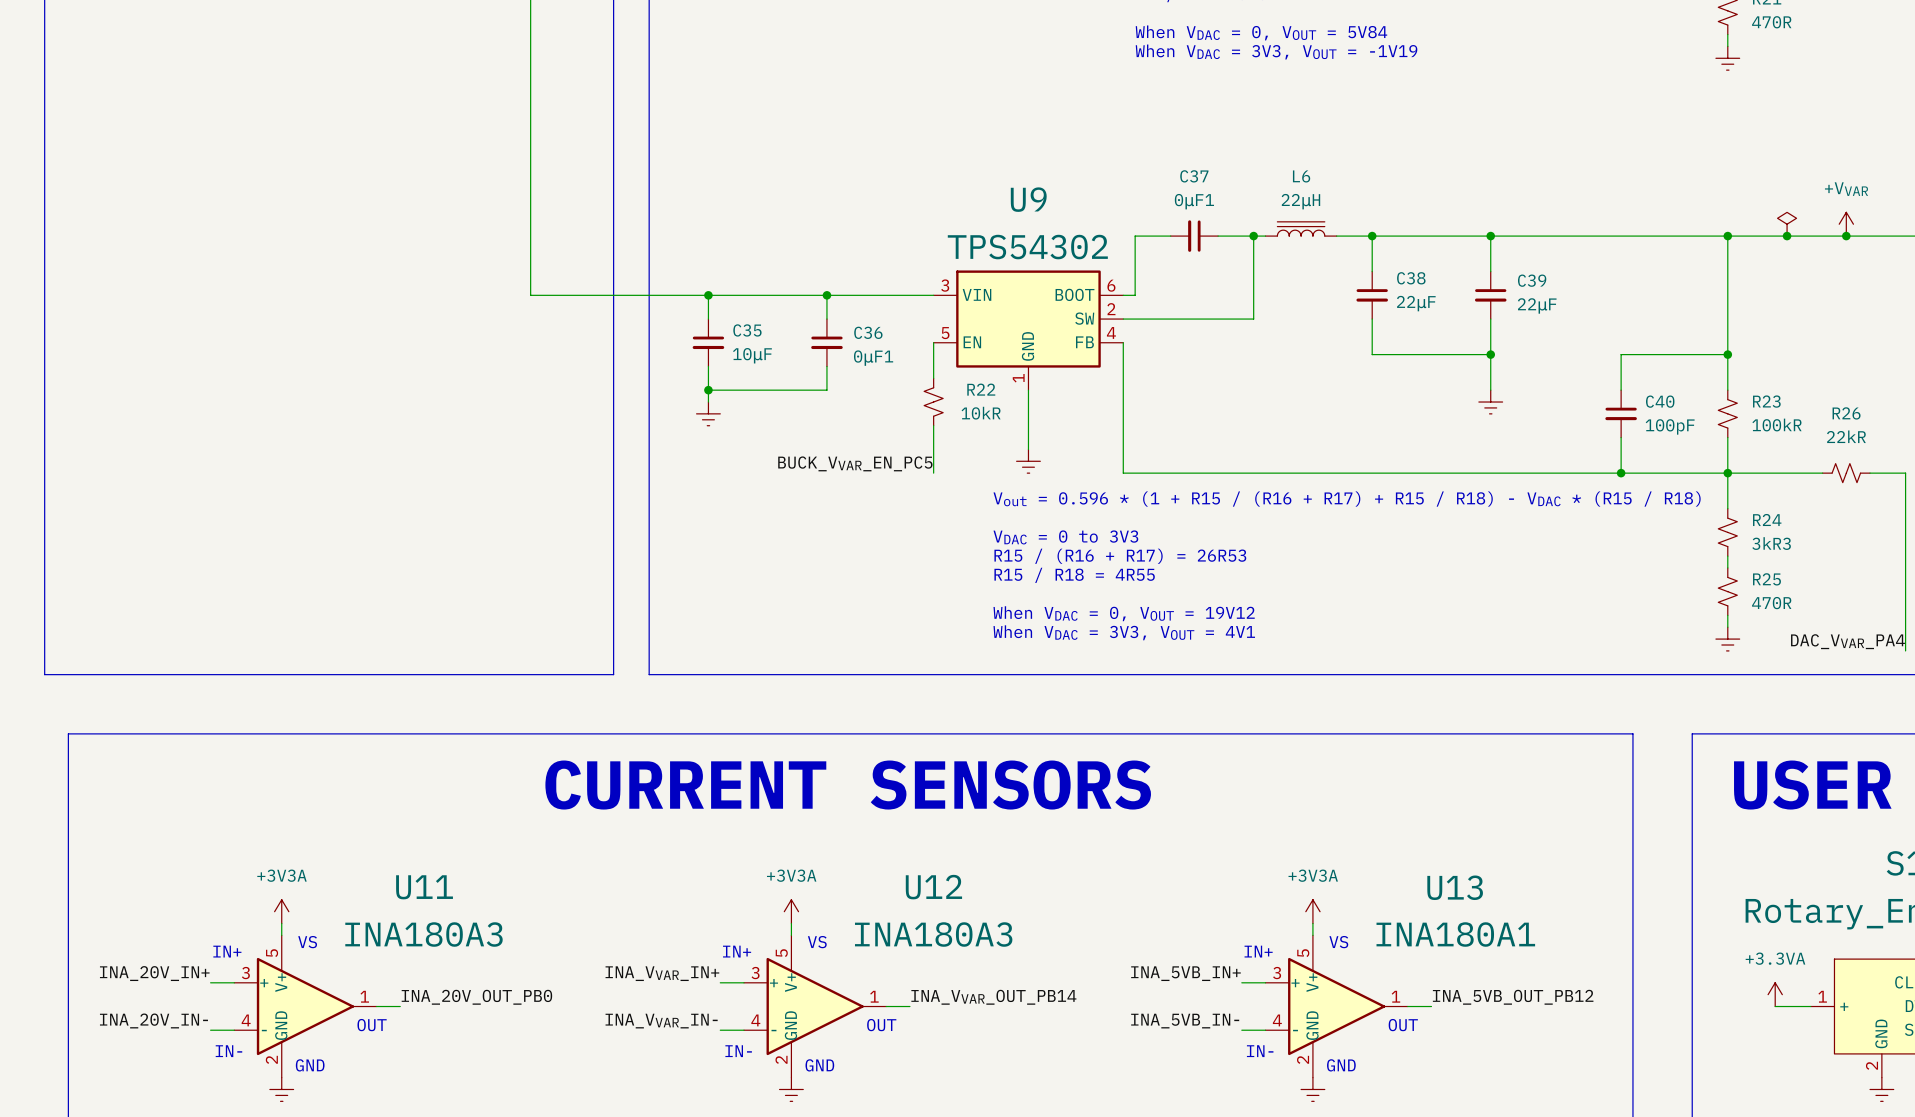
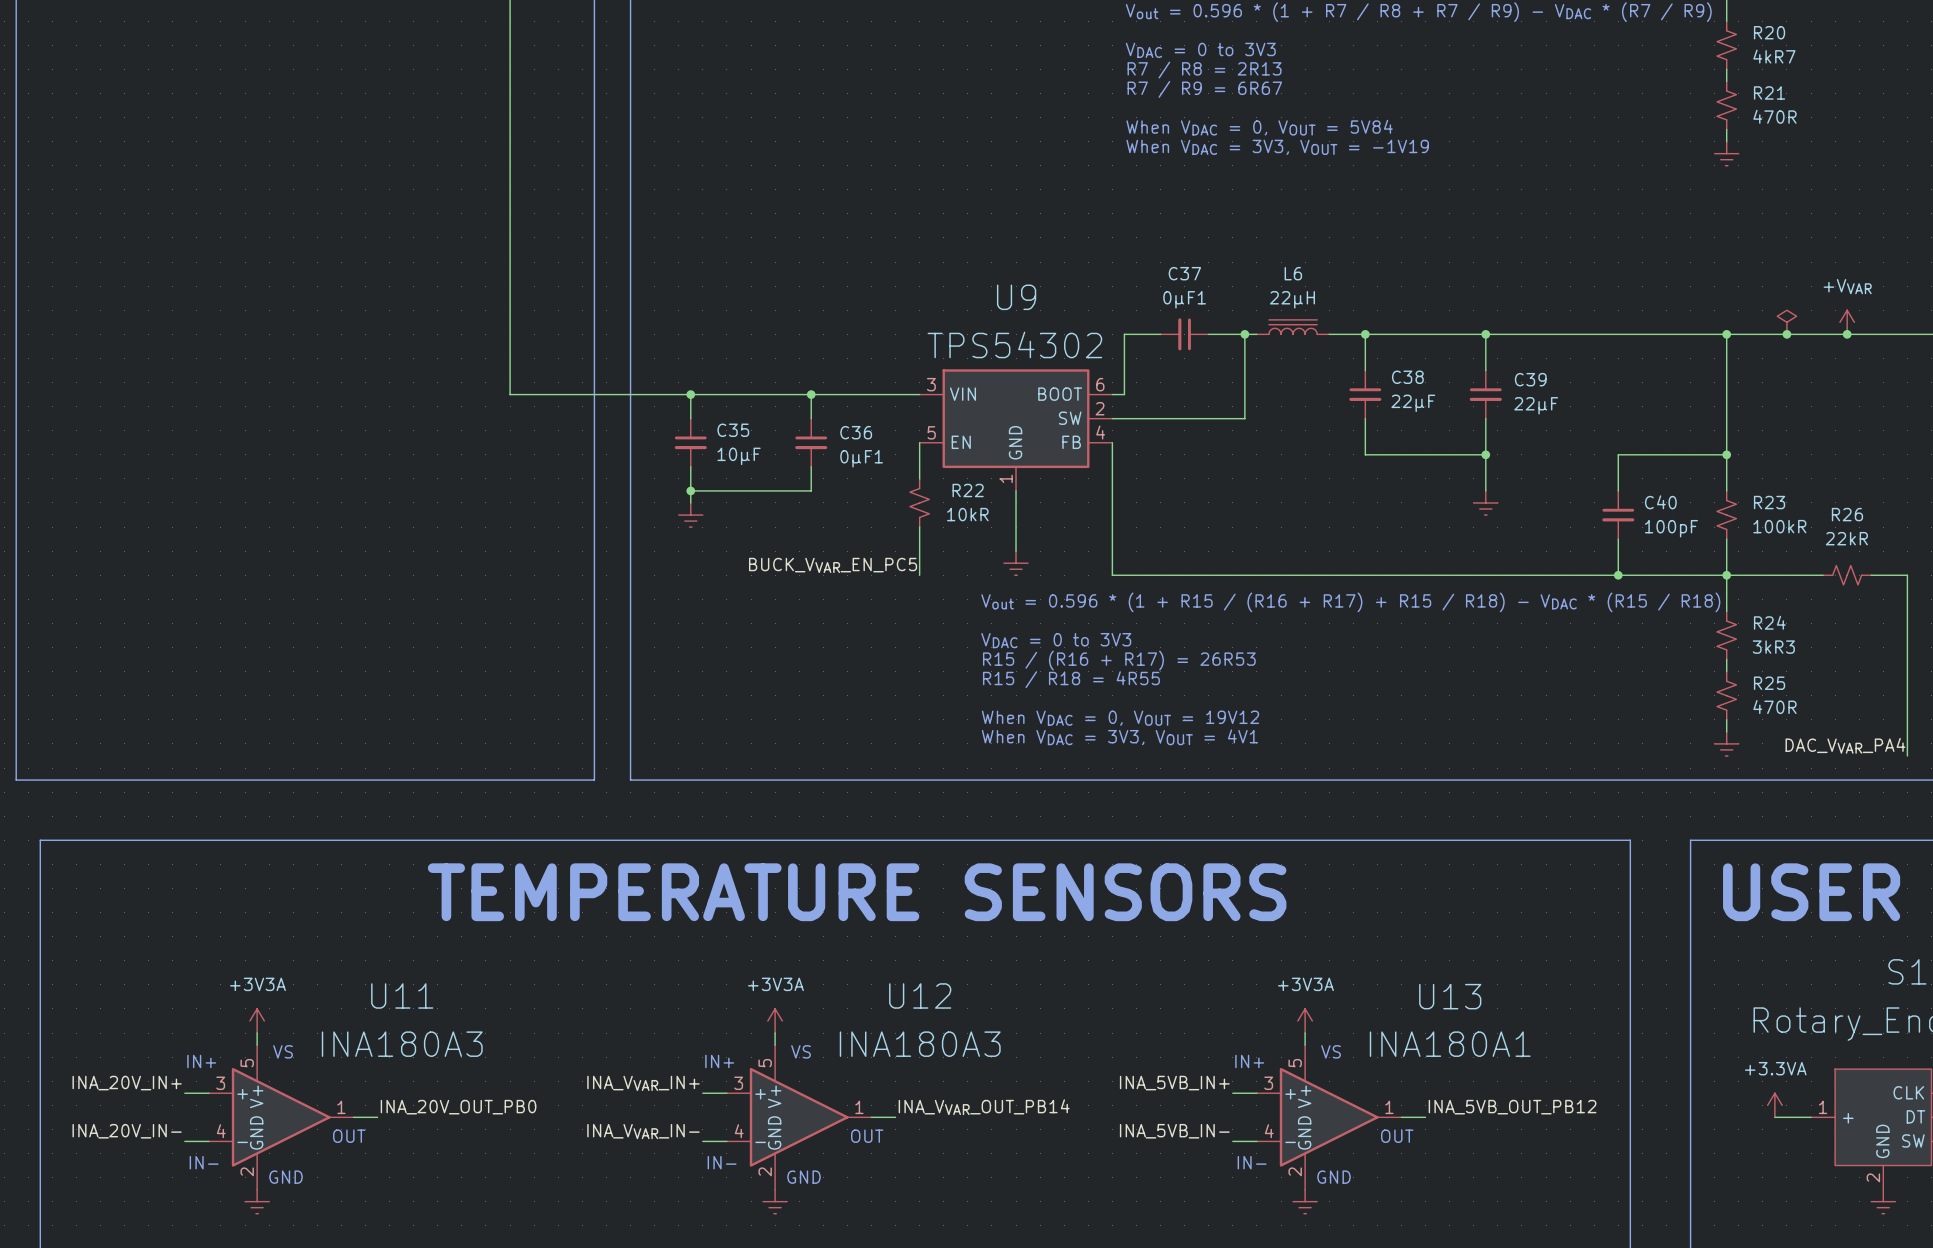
text: CURRENT SENSORS (848, 785) -> TEMPERATURE SENSORS (857, 892)

